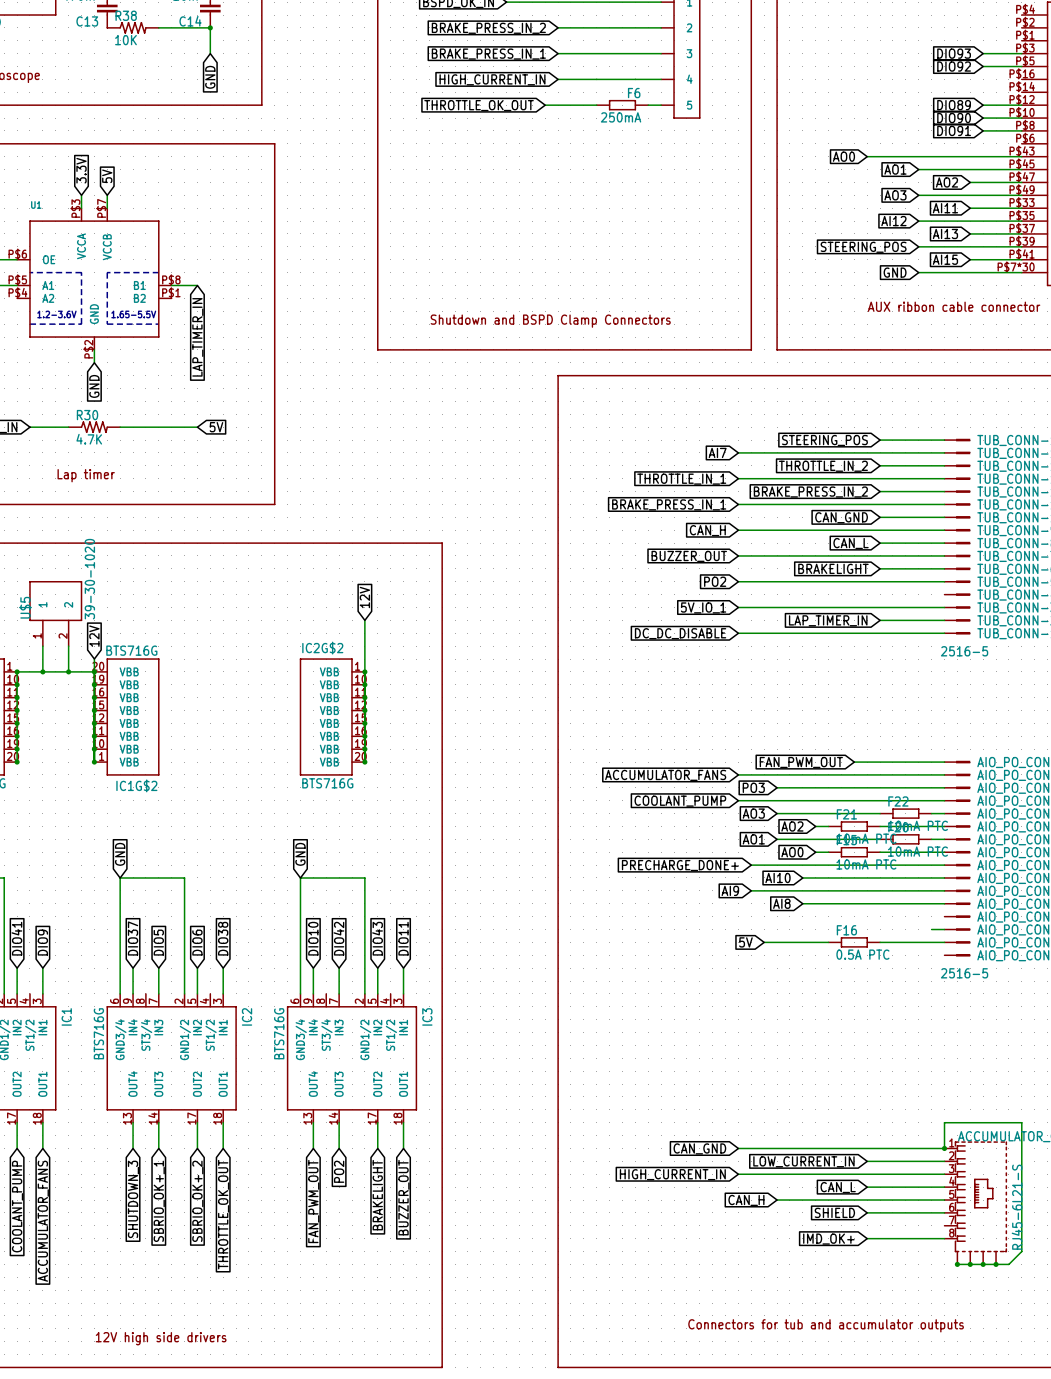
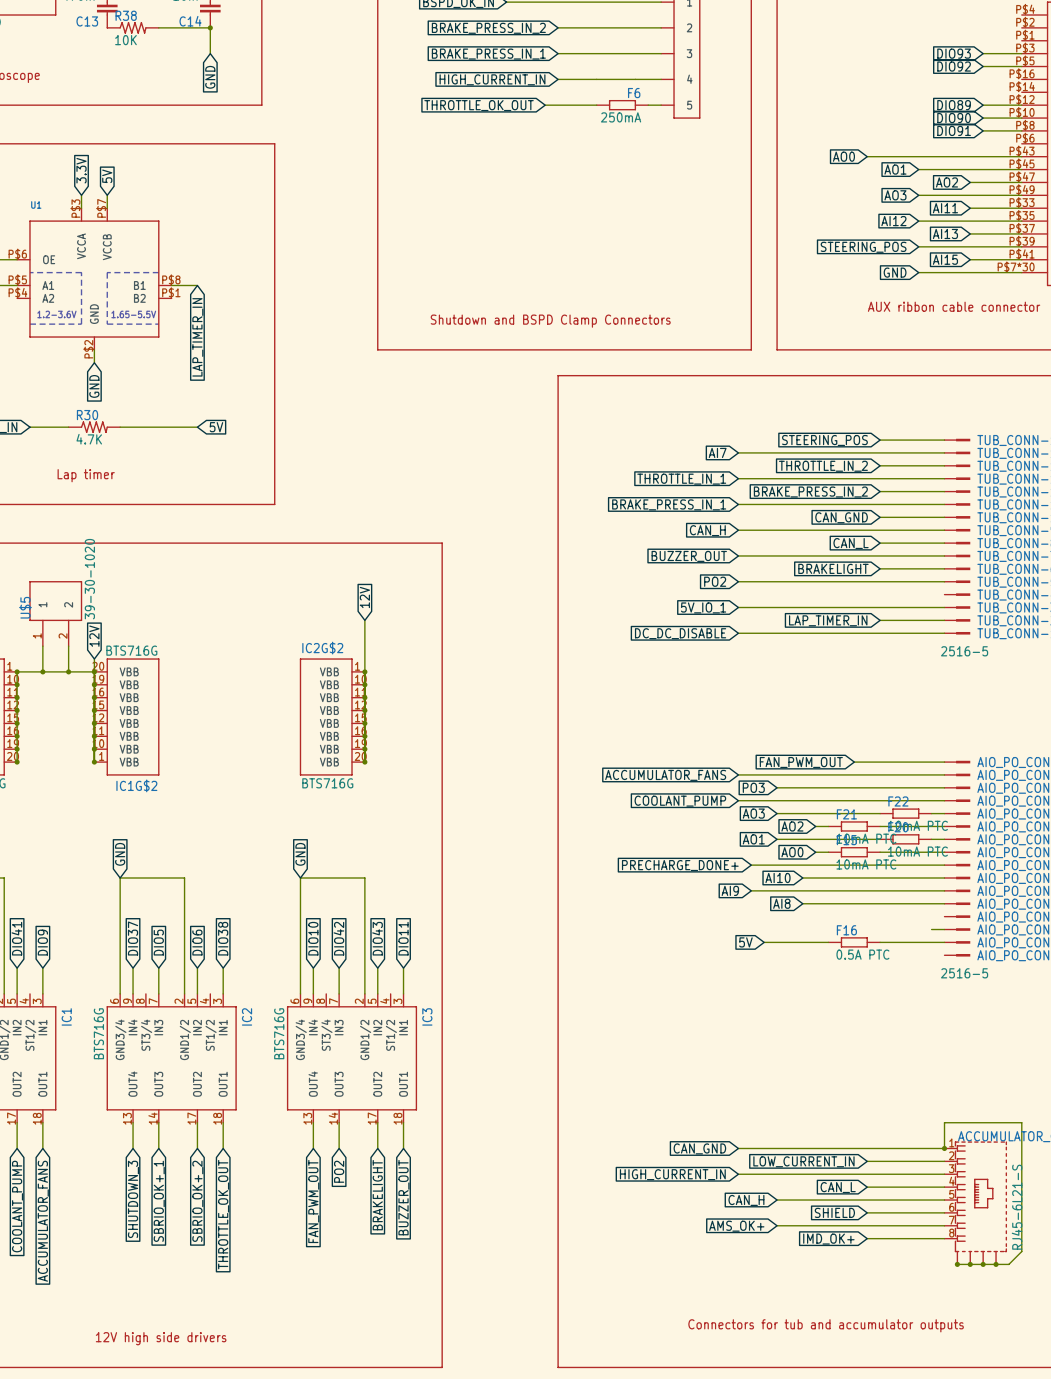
wire: none -> (777, 1225) (944, 1225)
global label: none -> AMS_OK+ (736, 1226)

